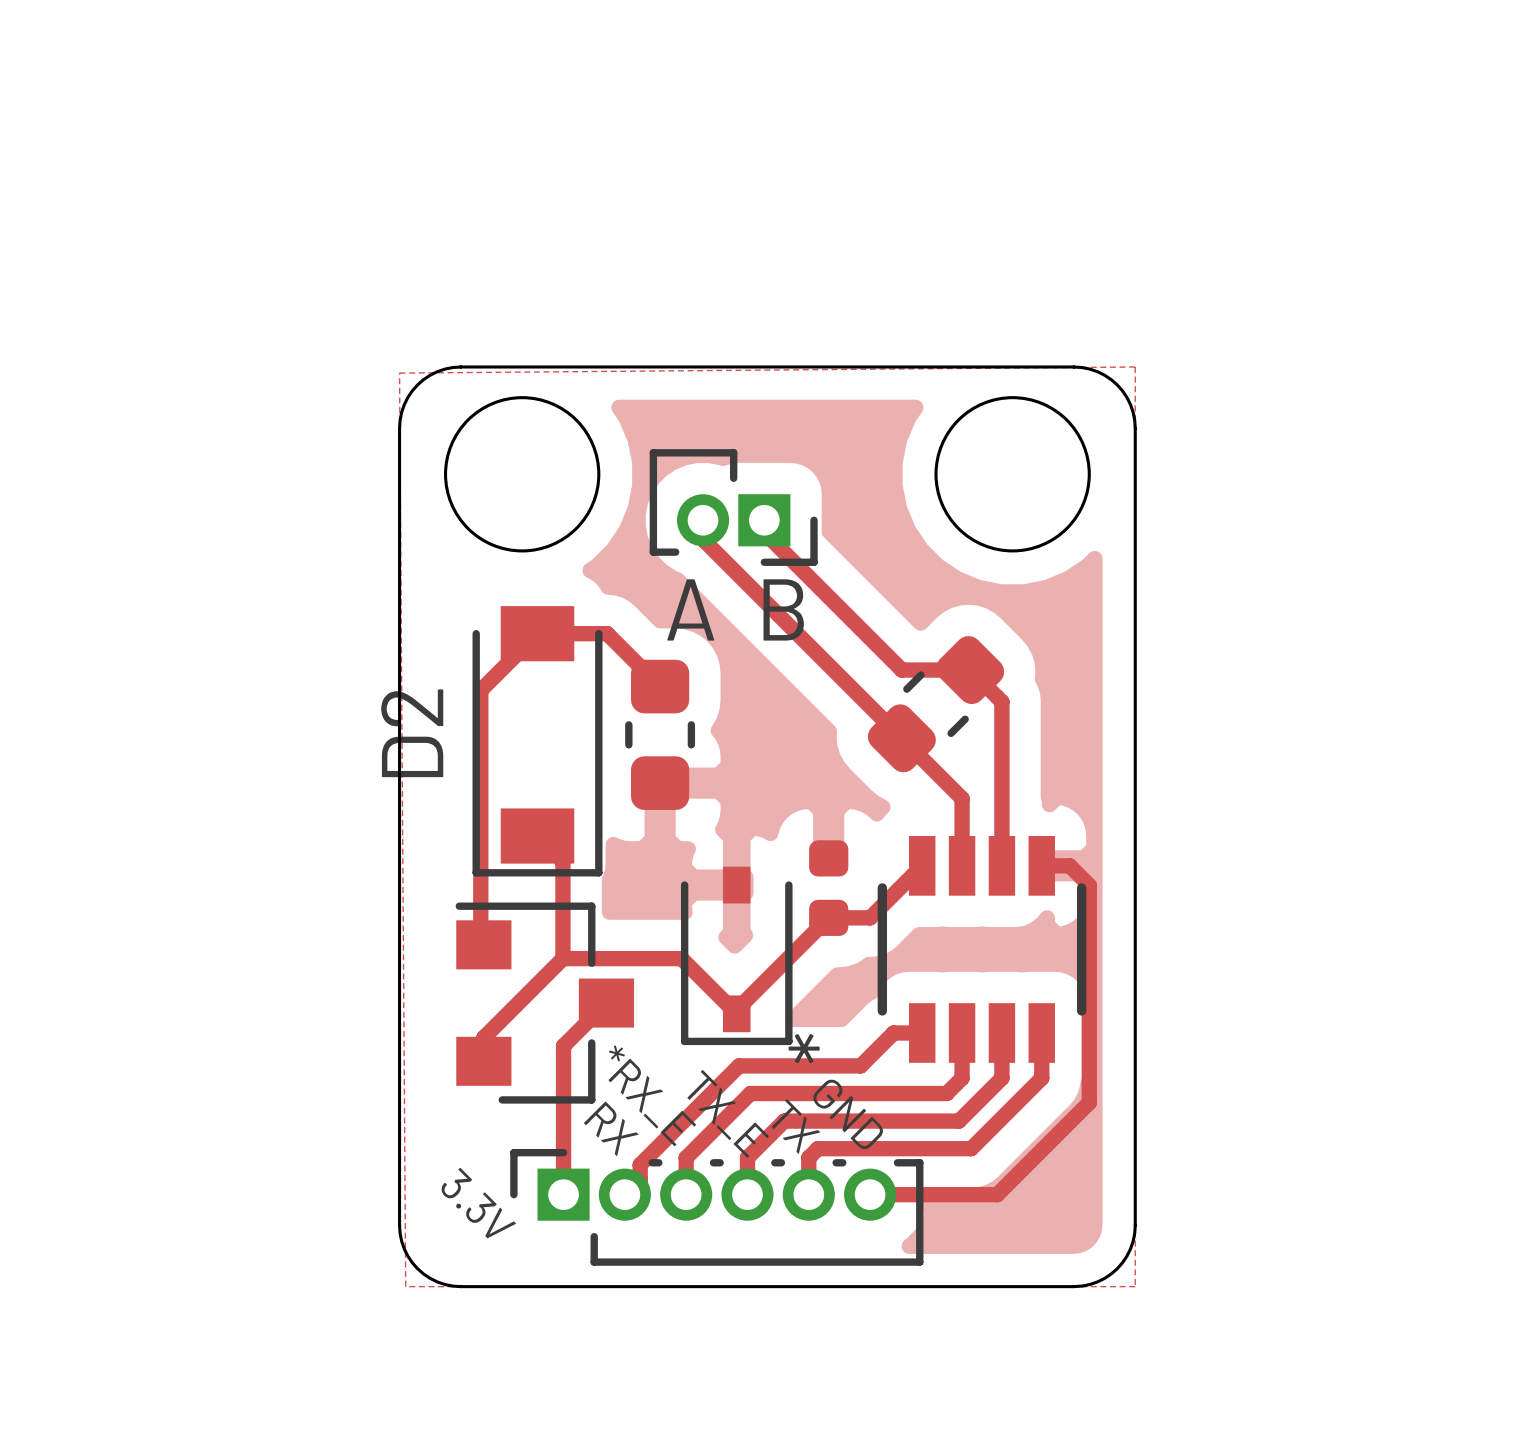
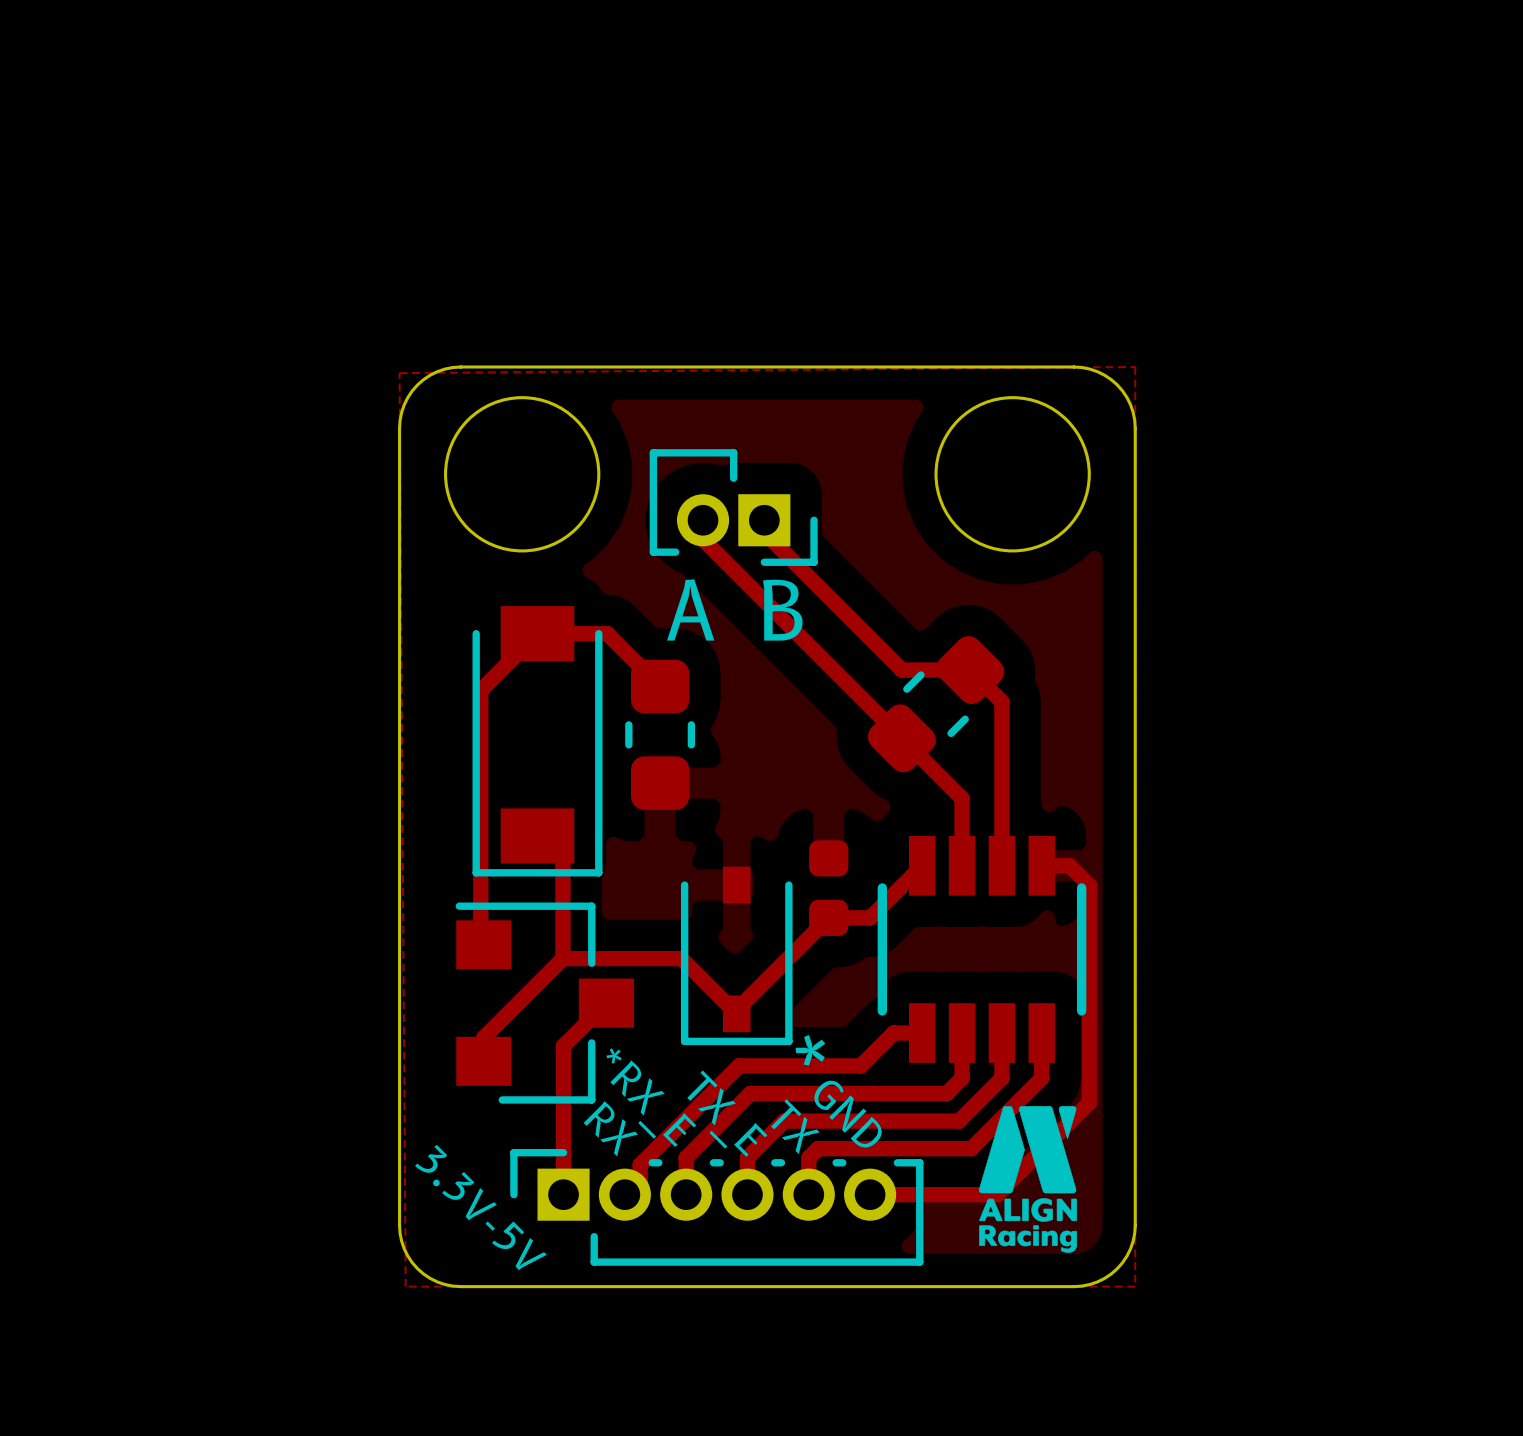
D2 name: D2 (412, 733) -> none
drawing: none -> [978, 1106, 1078, 1253]
text: 3.3V (478, 1202) -> 3.3V-5V (480, 1207)

